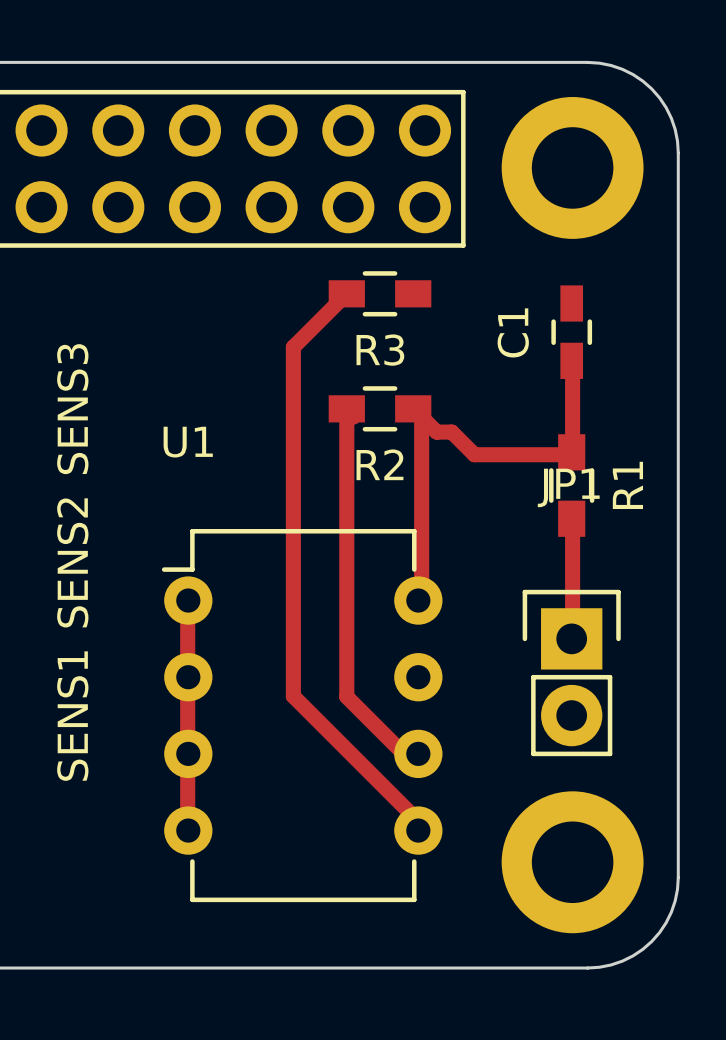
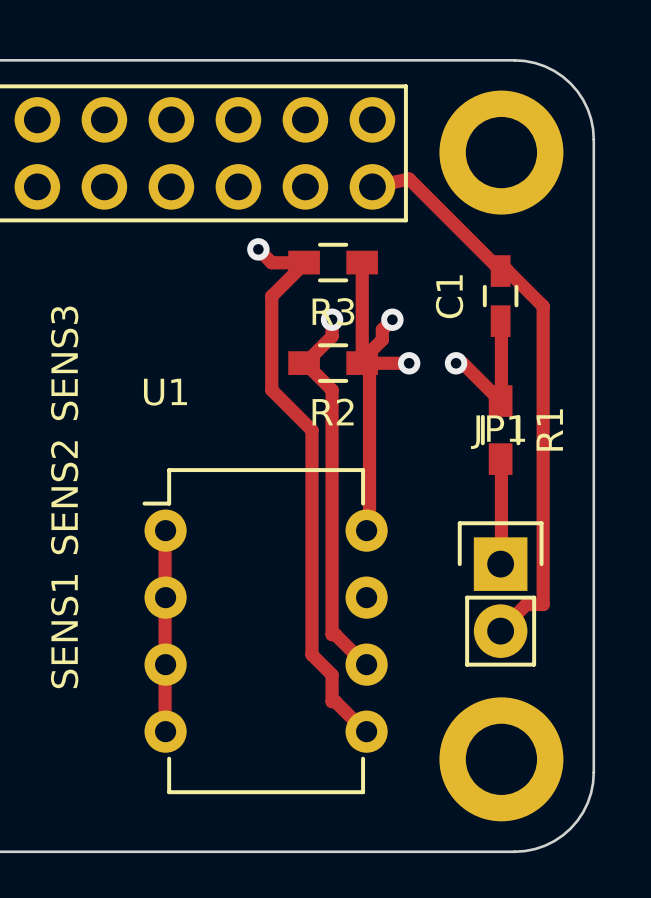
track: none -> (372, 186) (409, 179) (499, 269)
track: none -> (258, 249) (271, 262) (305, 262) (271, 296) (271, 390) (311, 430) (311, 654) (332, 674) (332, 701) (335, 701) (366, 731)
via: none -> (258, 249)
track: none -> (362, 262) (362, 363) (409, 363)
track: (346, 296) (346, 293) (293, 347) (293, 696) (418, 821) (418, 830) (421, 832) -> none
track: none -> (499, 269) (506, 269) (543, 306) (543, 604) (526, 604) (500, 631)
track: none -> (332, 319) (332, 336) (305, 363) (332, 390) (332, 634) (335, 634) (366, 664)
via: none -> (332, 319)
track: none -> (392, 319) (382, 329) (382, 339) (362, 359)
via: none -> (392, 319)
track: (413, 408) (436, 432) (451, 432) (474, 454) (572, 454) -> none
via: none -> (409, 363)
track: none -> (456, 363) (462, 363) (499, 400)
via: none -> (456, 363)
track: (353, 416) (346, 408) (346, 696) (403, 753) (418, 753) (421, 756) -> none

